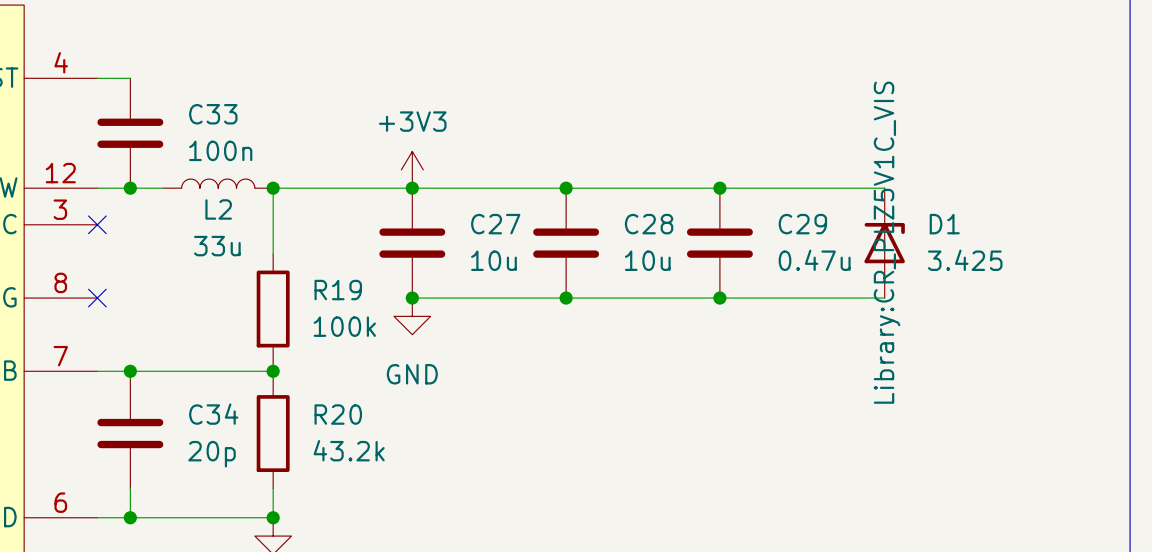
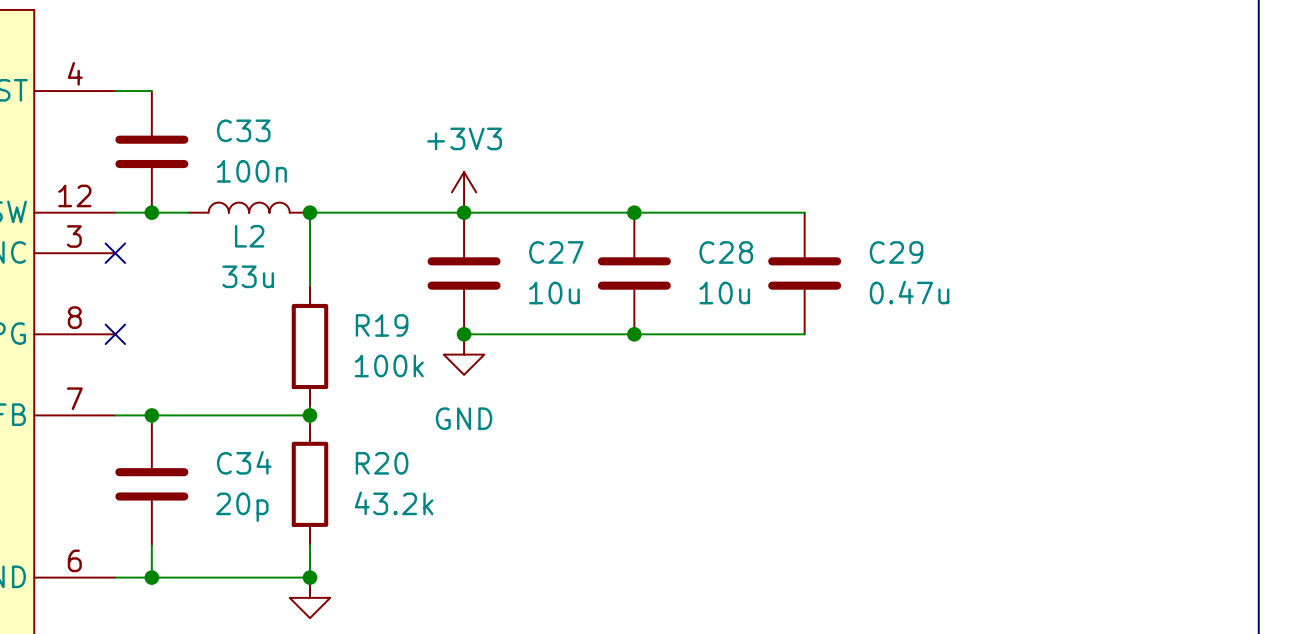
wire: (719, 188) (884, 188) -> none
junction: (719, 188) -> none
D1: 3.425 (884, 243) -> none
wire: (719, 298) (884, 298) -> none
junction: (719, 298) -> none

